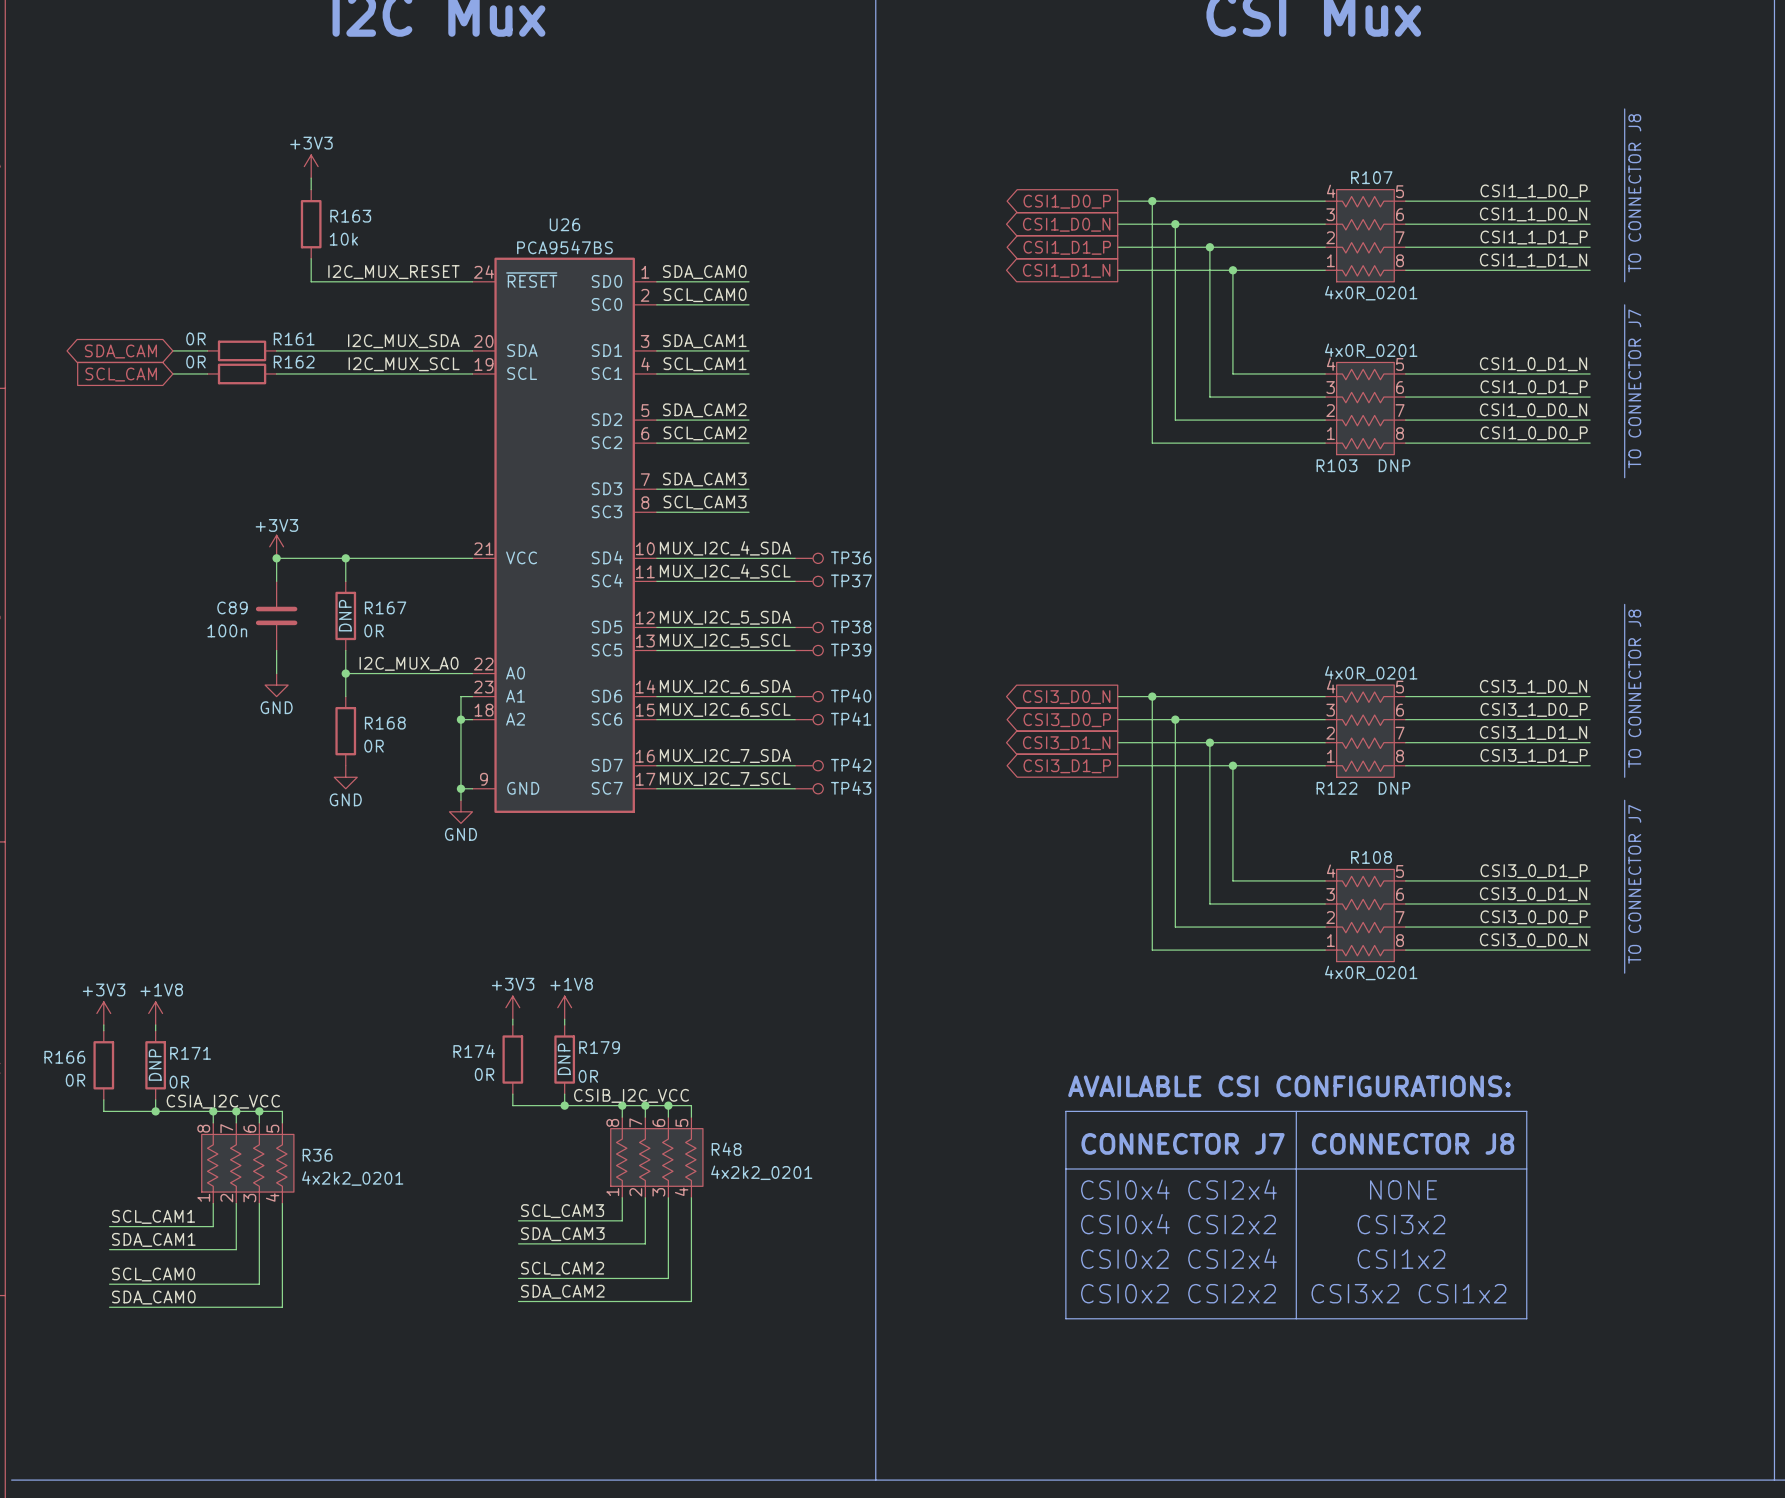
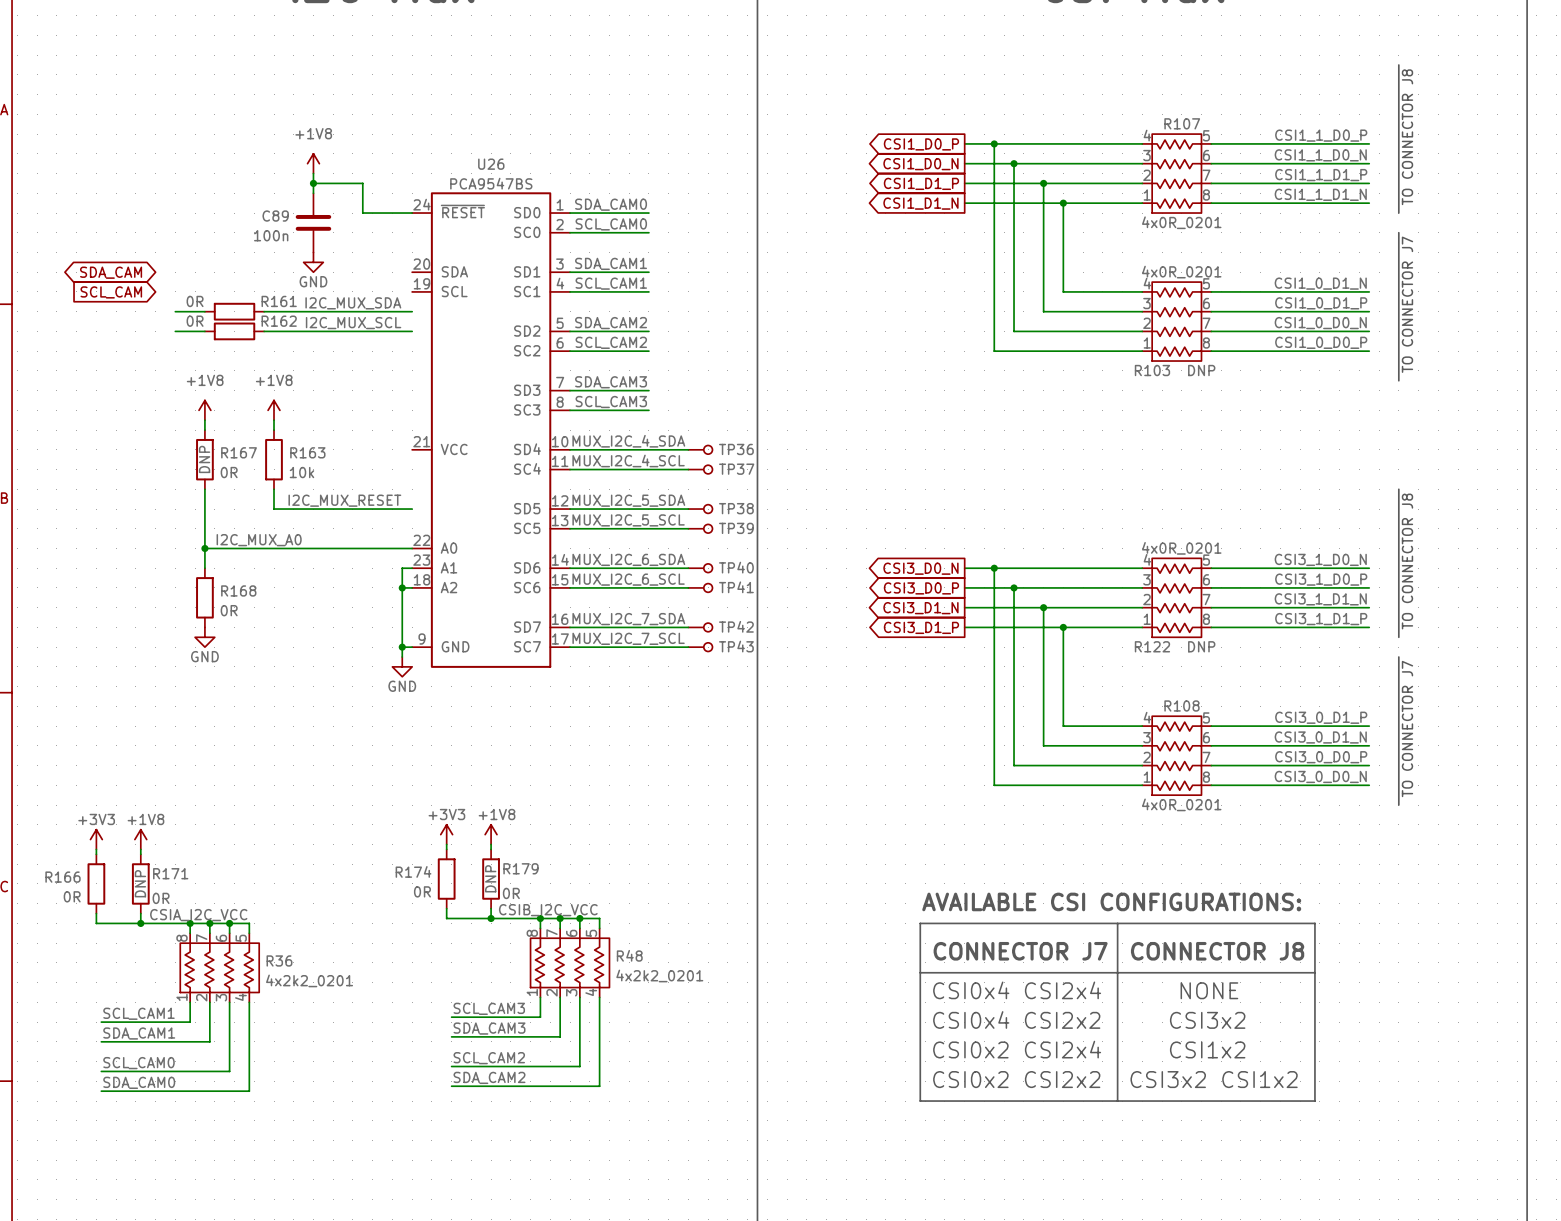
power symbol: +3V3 (311, 166) -> none
wire: (311, 178) (311, 189) -> none
R163 position: (311, 224) -> (274, 459)
power symbol: none -> +1V8 (313, 163)
wire: none -> (313, 173) (313, 193)
junction: none -> (313, 183)
wire: (311, 258) (311, 281) (414, 281) -> (313, 183) (362, 183) (362, 213)
label: I2C_MUX_RESET (393, 272) -> none
power symbol: none -> GND (313, 262)
label position: I2C_MUX_SDA (403, 341) -> I2C_MUX_SDA (353, 303)
wire: (172, 350) (207, 350) -> (175, 311) (204, 311)
R161 position: (242, 350) -> (234, 311)
wire: (276, 350) (472, 350) -> none
label position: I2C_MUX_SCL (404, 364) -> I2C_MUX_SCL (353, 323)
wire: (172, 373) (207, 373) -> (175, 331) (204, 331)
R162 position: (242, 373) -> (234, 331)
wire: (276, 373) (472, 373) -> none
wire: none -> (264, 311) (412, 311)
wire: none -> (264, 331) (412, 331)
power symbol: none -> +1V8 (204, 410)
power symbol: none -> +1V8 (274, 410)
wire: none -> (204, 420) (204, 430)
wire: none -> (274, 420) (274, 430)
power symbol: +3V3 (276, 546) -> none
junction: (276, 558) -> none
wire: (345, 558) (345, 581) -> none
junction: (345, 558) -> none
wire: (472, 558) (276, 558) (276, 581) -> none
wire: none -> (204, 489) (204, 568)
wire: none -> (274, 489) (274, 509) (412, 509)
C89 position: (276, 615) -> (313, 222)
R167 position: (345, 615) -> (204, 459)
label: none -> I2C_MUX_RESET (344, 500)
wire: (276, 650) (276, 673) -> none
wire: (345, 650) (345, 696) -> none
label position: I2C_MUX_A0 (409, 663) -> I2C_MUX_A0 (259, 540)
wire: none -> (204, 548) (303, 548)
junction: none -> (204, 548)
junction: (345, 673) -> none
power symbol: GND (276, 685) -> none
R168 position: (345, 731) -> (204, 597)
power symbol: none -> GND (204, 637)
power symbol: GND (345, 777) -> none

